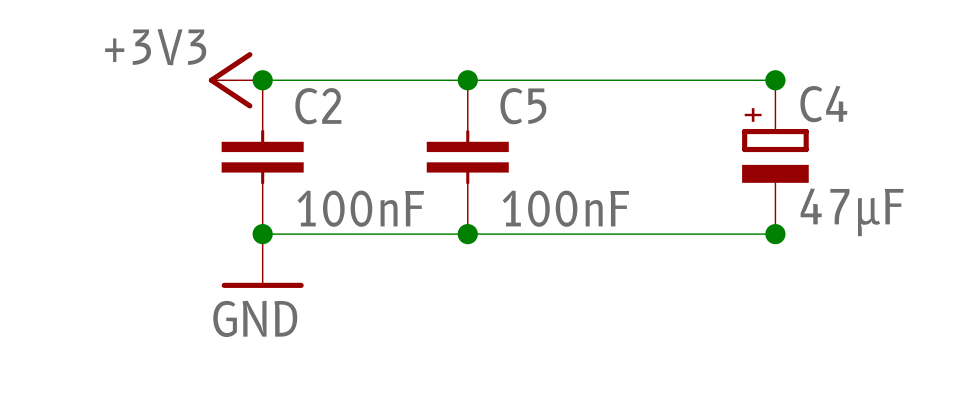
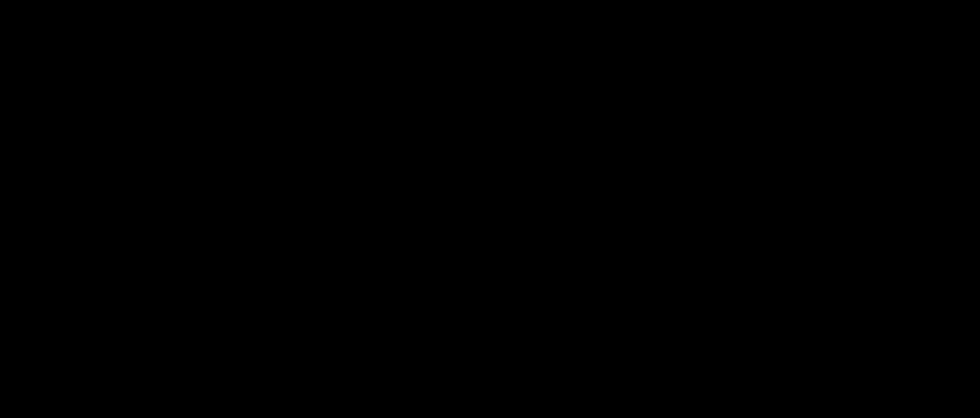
power symbol: +3V3 (235, 80) -> none
wire: (262, 80) (775, 80) -> none
junction: (262, 80) -> none
junction: (467, 80) -> none
junction: (775, 80) -> none
C2: 100nF (262, 157) -> none
C5: 100nF (467, 157) -> none
C4: 47µF (775, 157) -> none
wire: (262, 234) (775, 234) -> none
junction: (262, 234) -> none
junction: (467, 234) -> none
junction: (775, 234) -> none
power symbol: GND (262, 261) -> none

